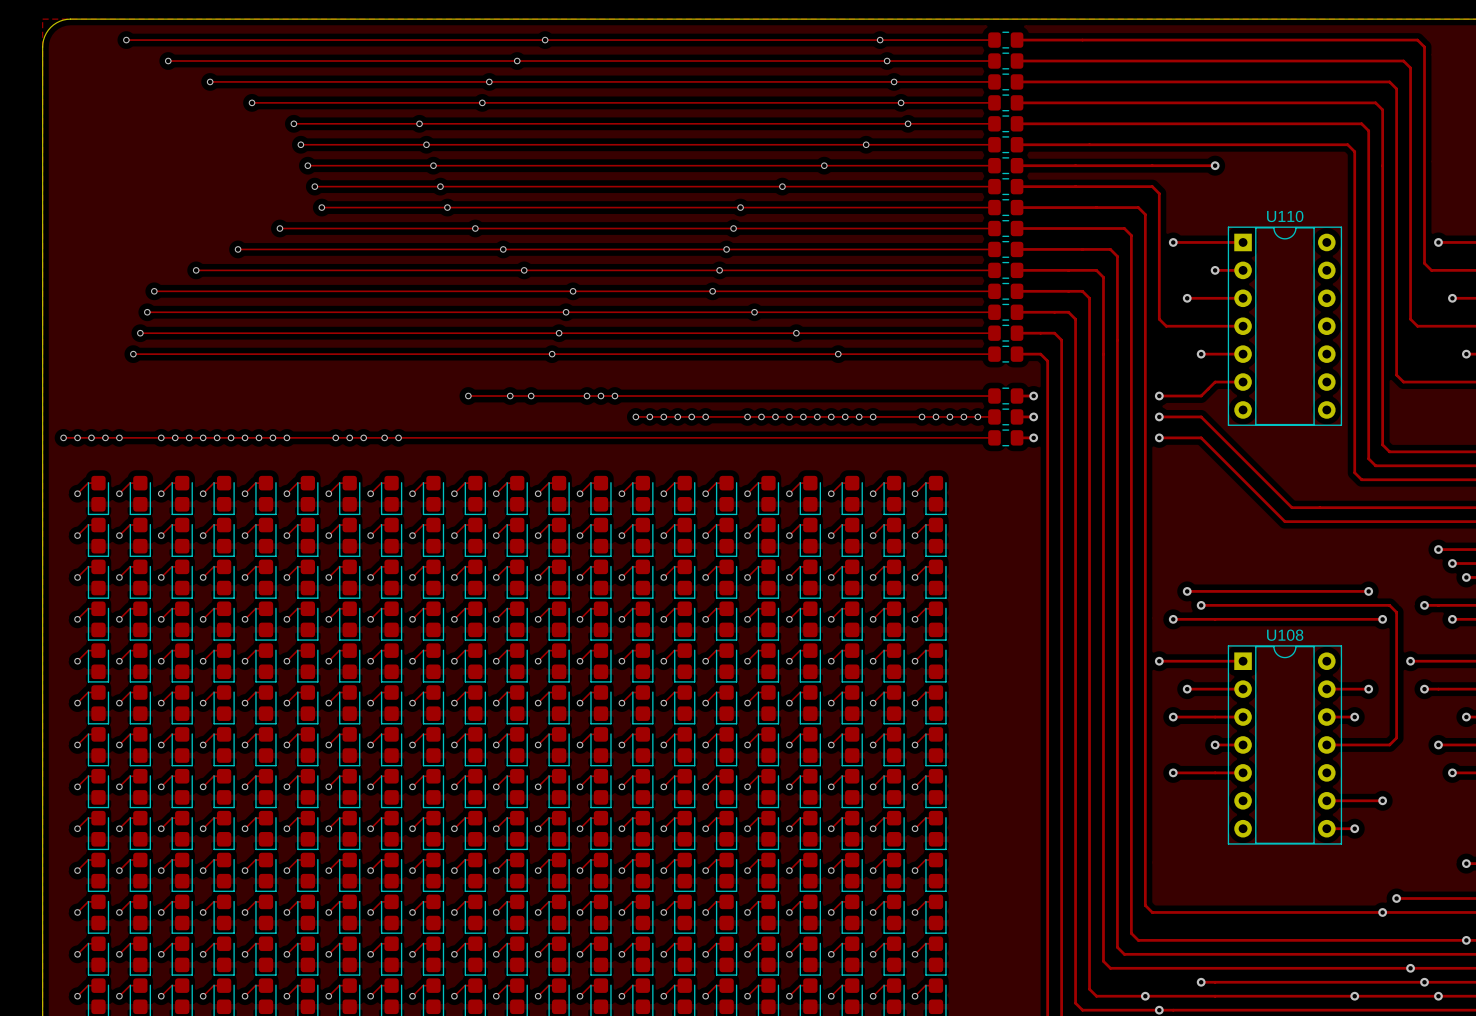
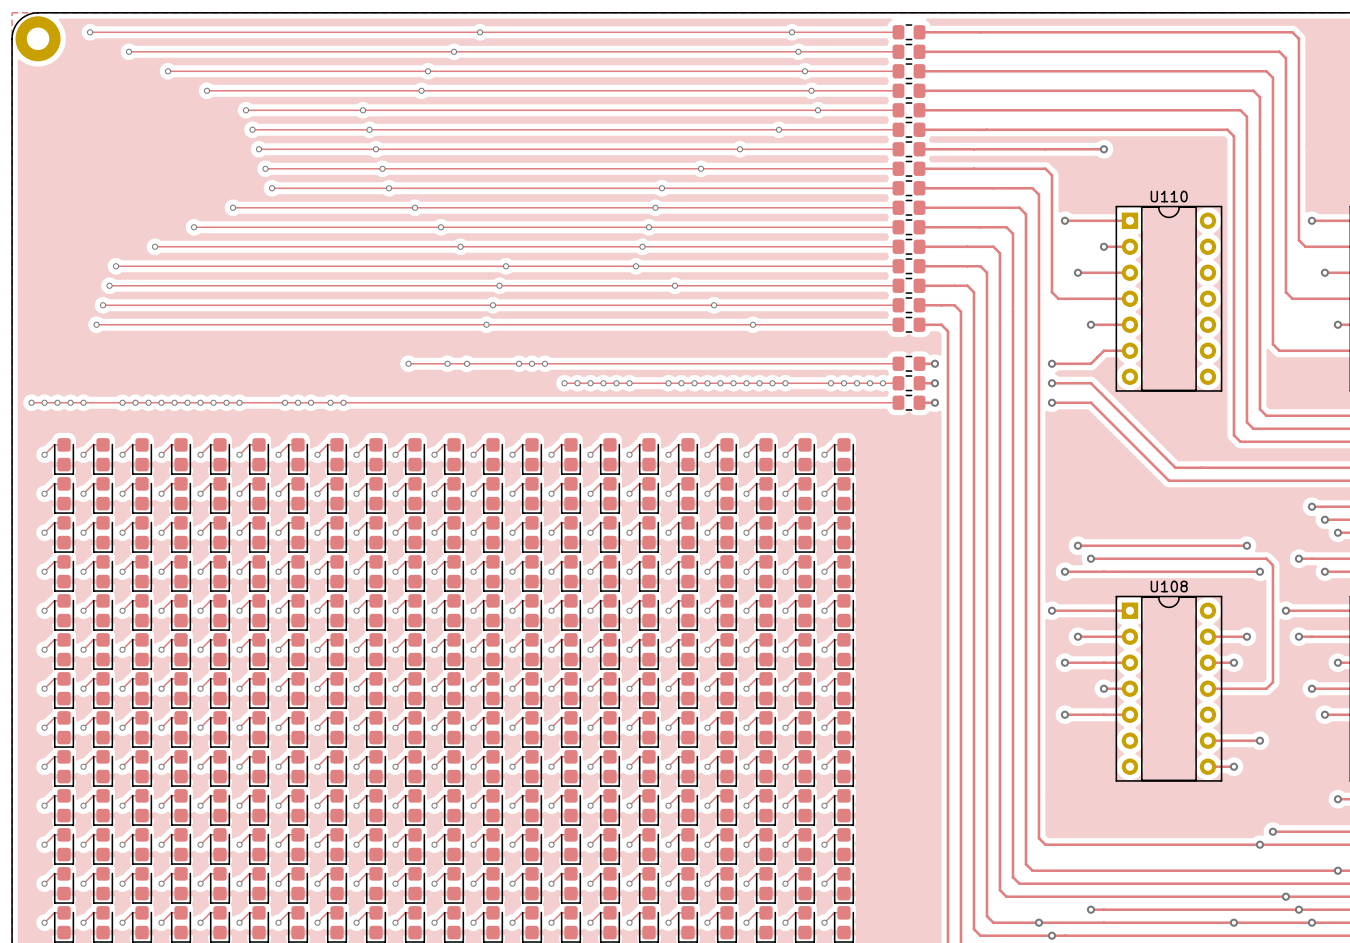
part: none -> (38, 38)

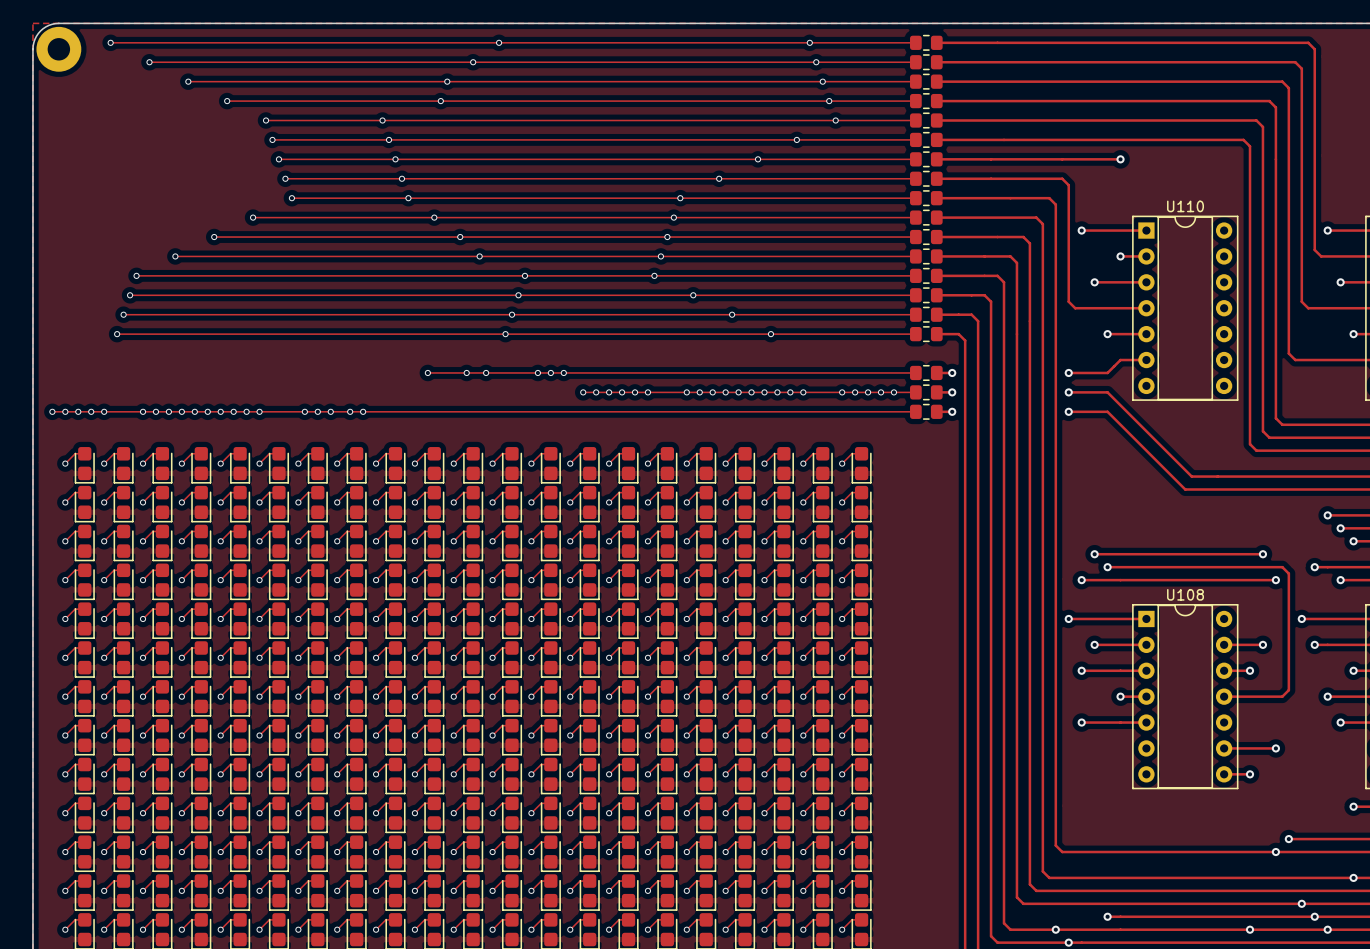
via: none -> (842, 392)
via: (830, 383) -> none
via: none -> (855, 392)
via: (843, 383) -> none
via: none -> (868, 392)
via: (856, 383) -> none
via: none -> (881, 392)
via: (869, 383) -> none
via: none -> (893, 392)
via: (882, 383) -> none

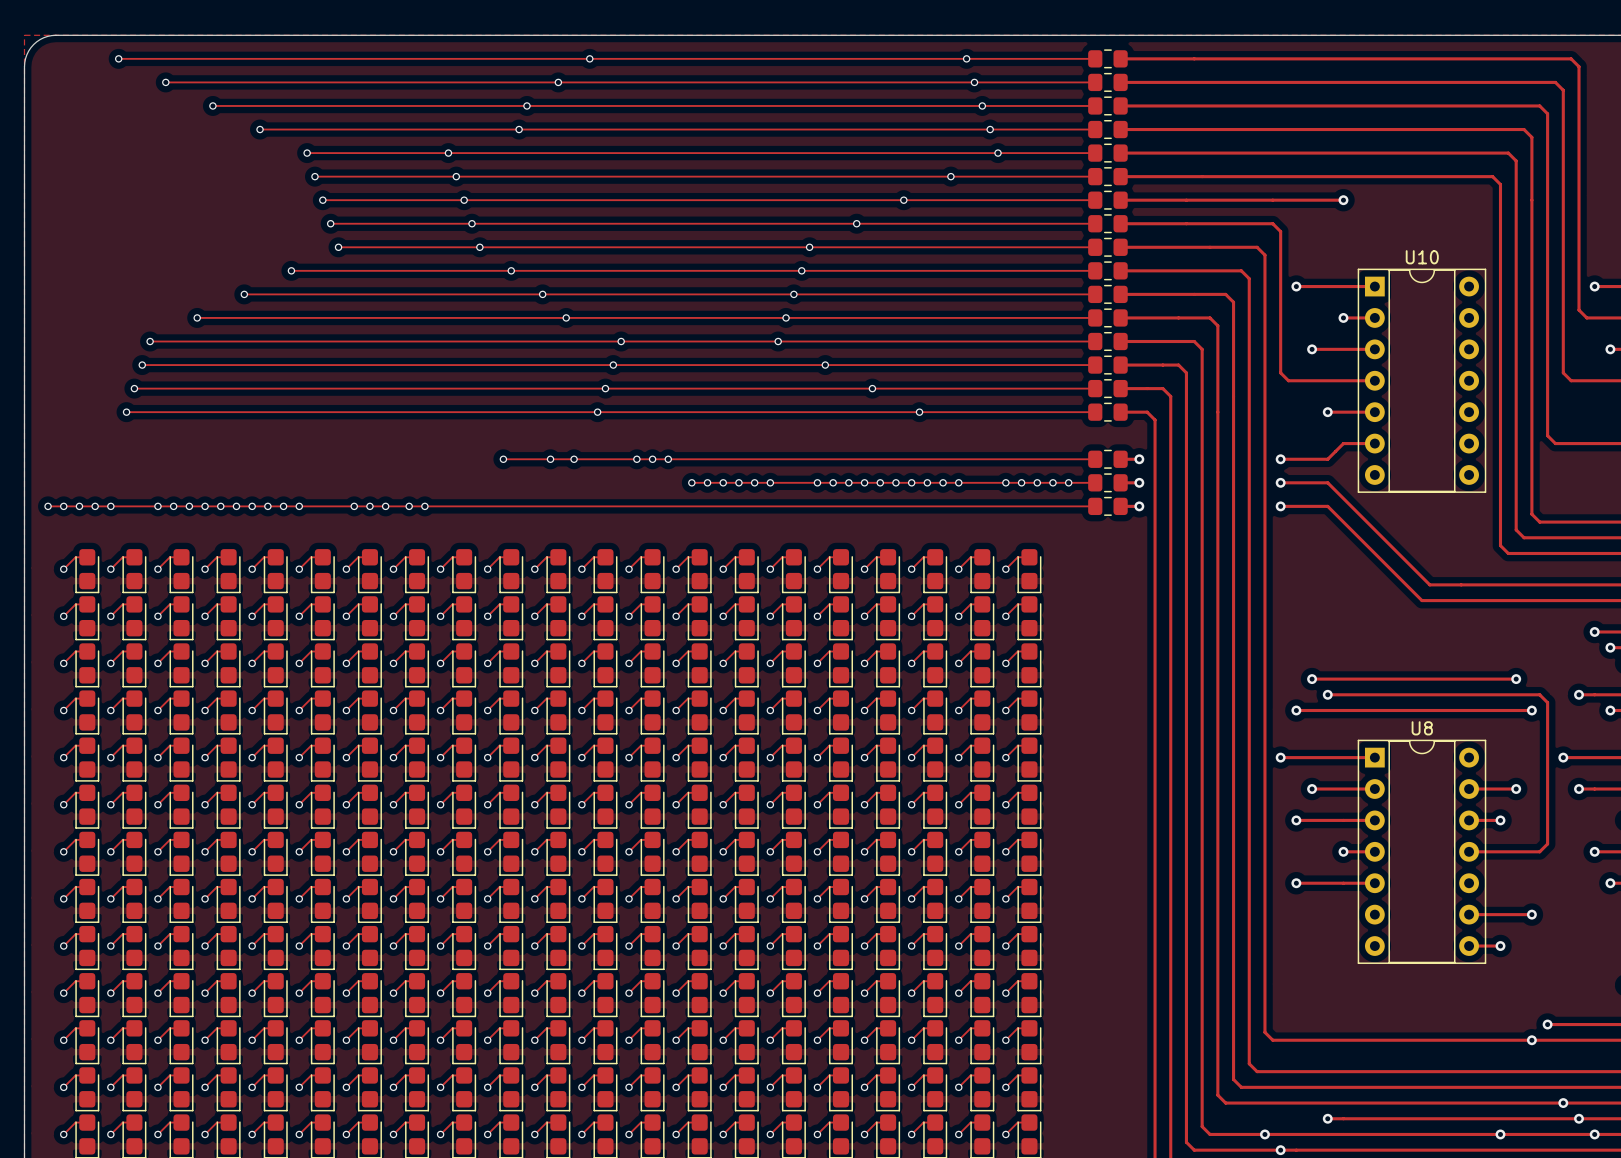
part: (58, 49) -> none
U110 name: U110 (1185, 206) -> U10 (1422, 257)
U108 name: U108 (1185, 594) -> U8 (1422, 728)

